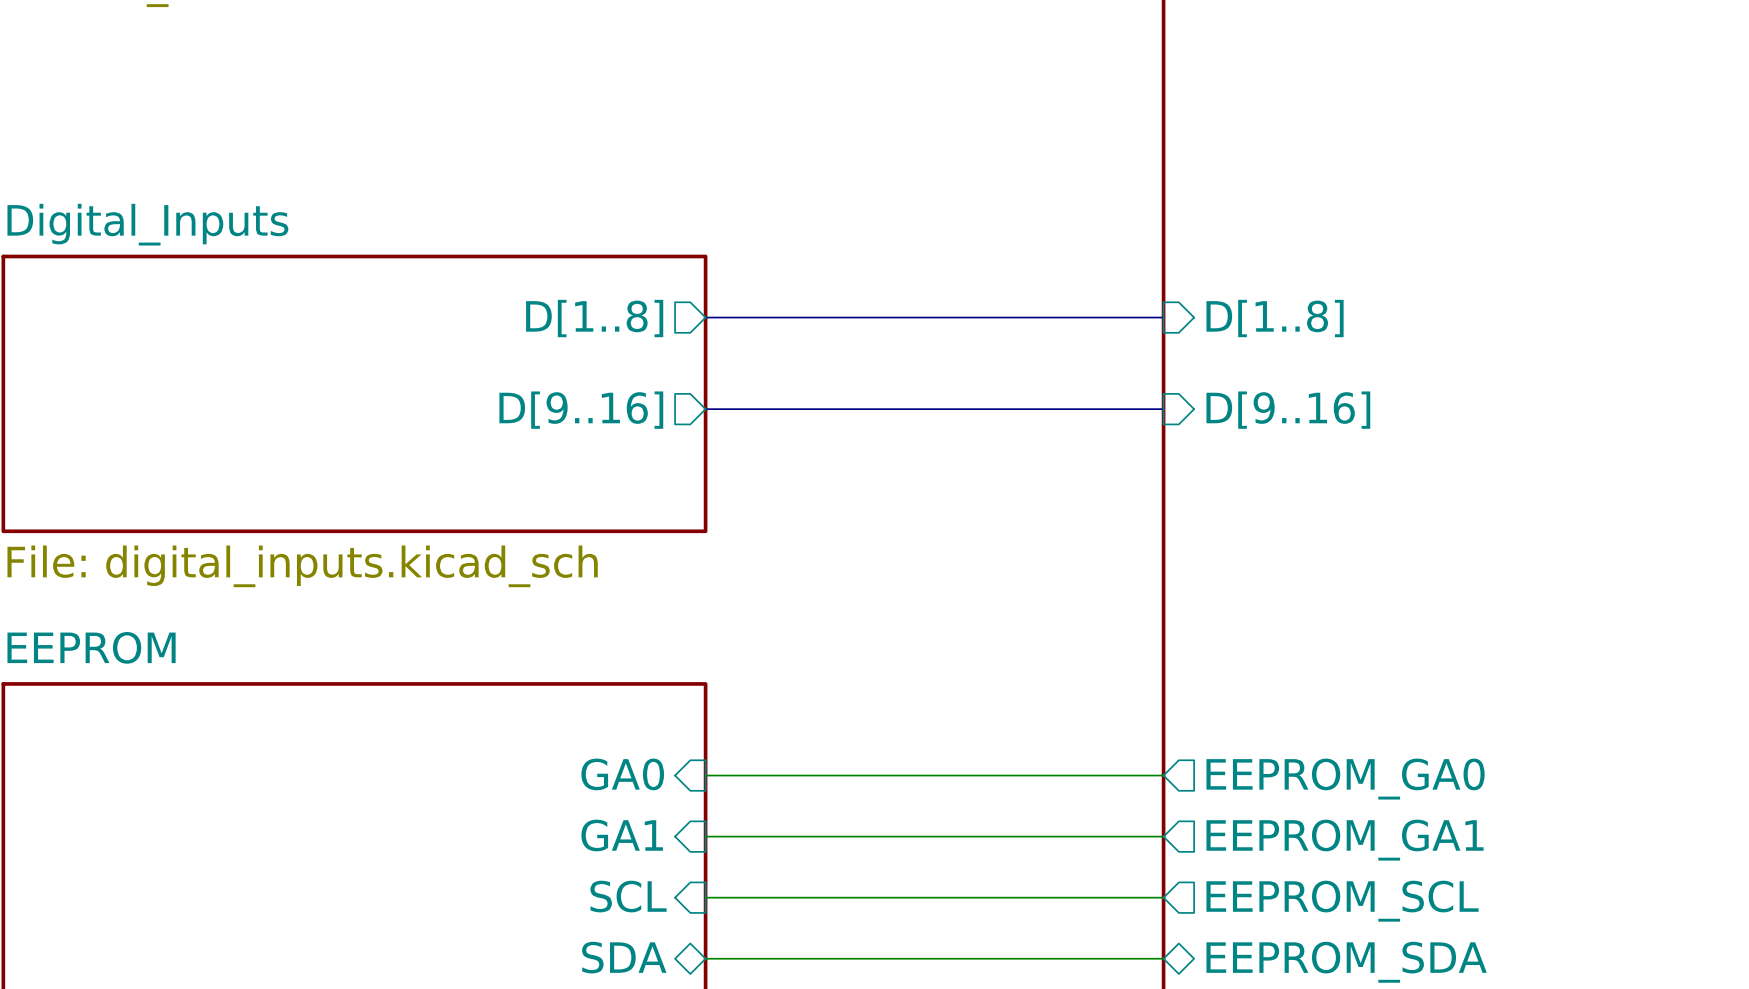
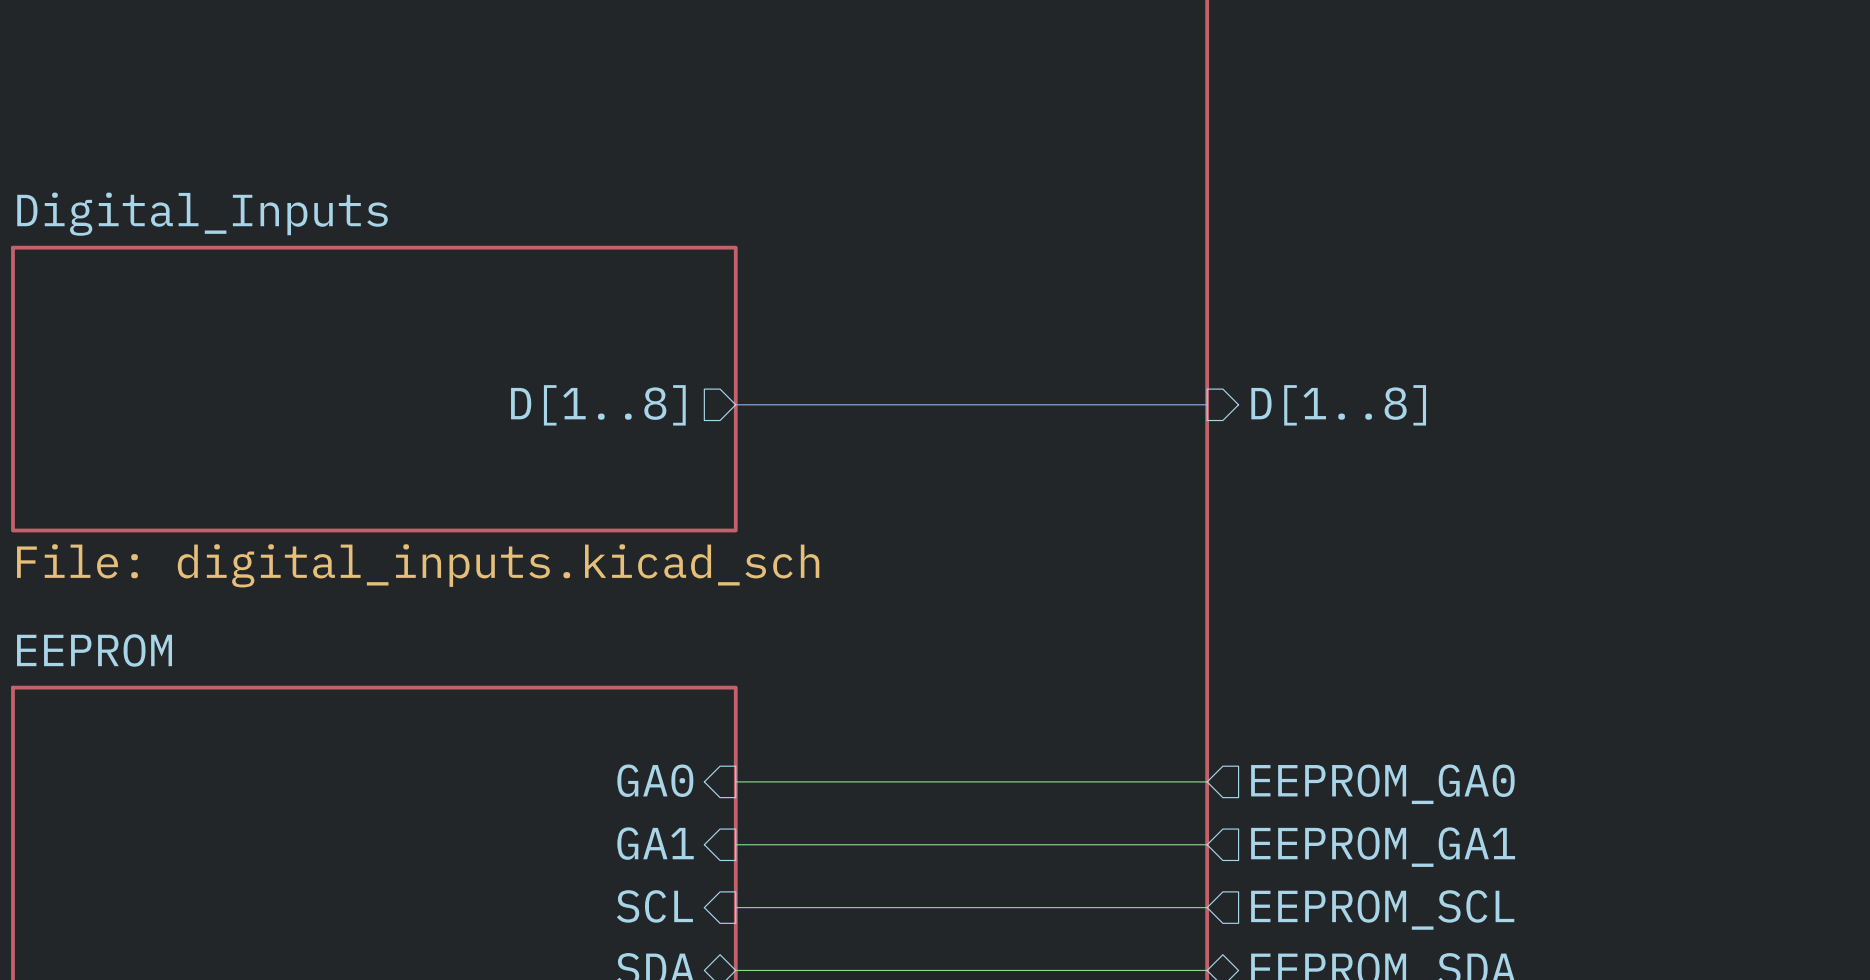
bus: (705, 317) (1163, 317) -> none
sheet pin: D[1..8] (594, 318) -> none
sheet pin: D[1..8] (1275, 318) -> none
sheet pin: D[9..16] (581, 410) -> D[1..8] (598, 405)
sheet pin: D[9..16] (1288, 410) -> D[1..8] (1338, 405)

